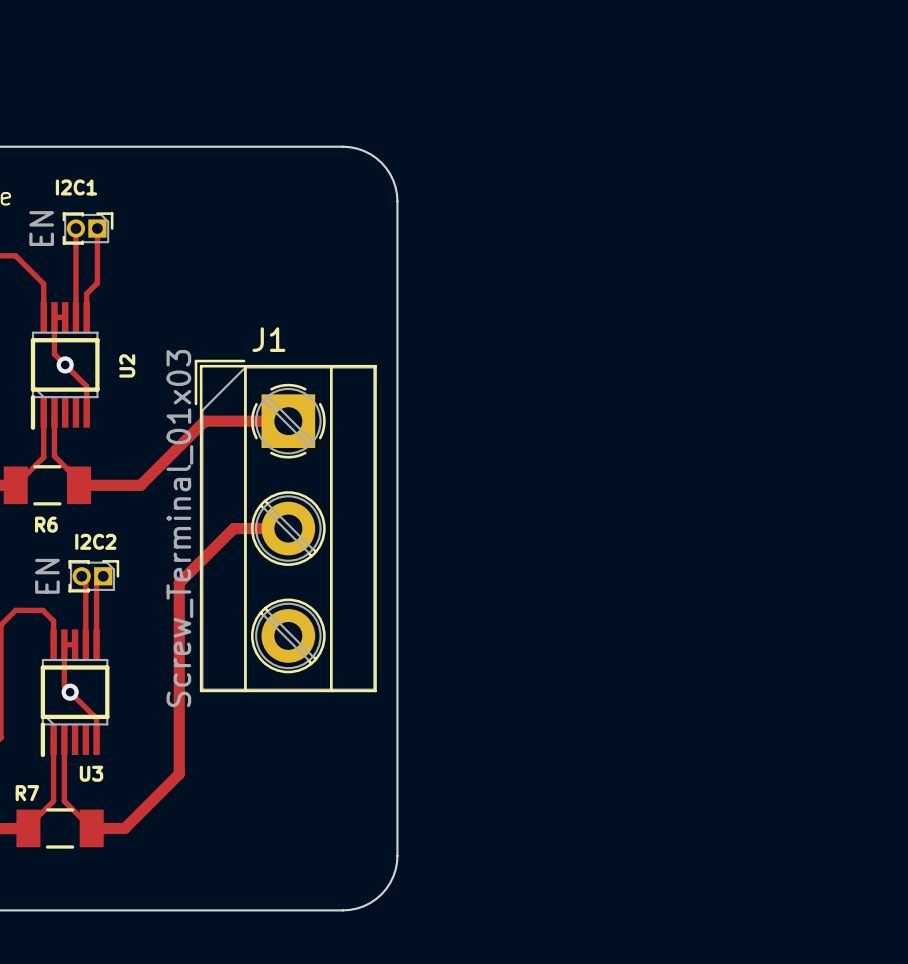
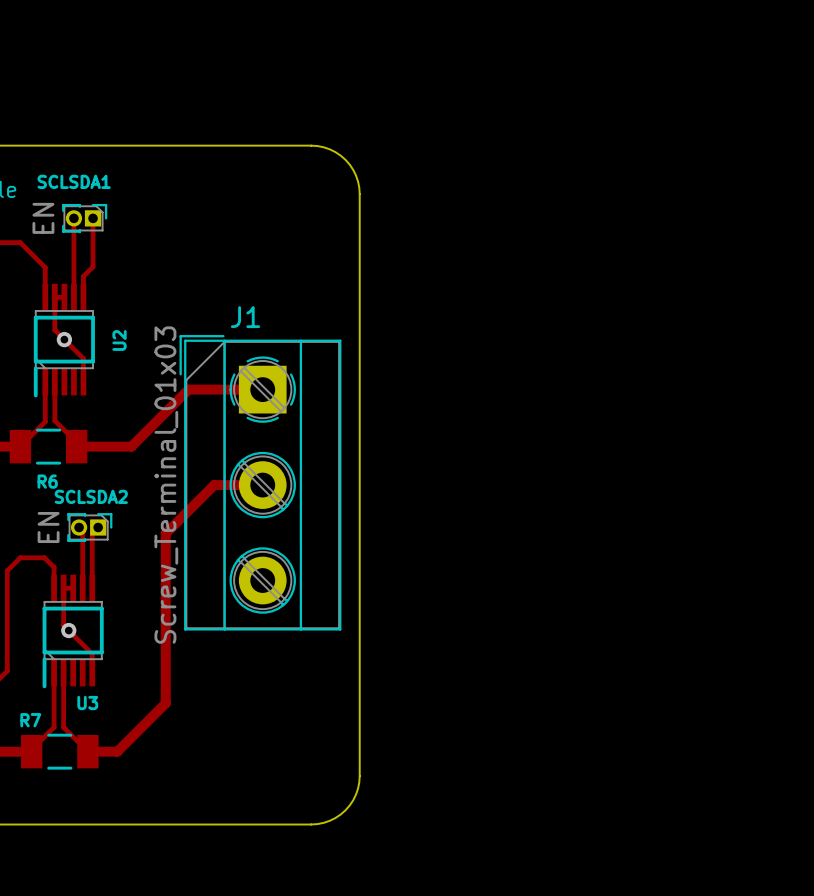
I2C1 name: I2C1 (76, 187) -> SCLSDA1 (74, 181)
I2C2 name: I2C2 (95, 541) -> SCLSDA2 (91, 496)

